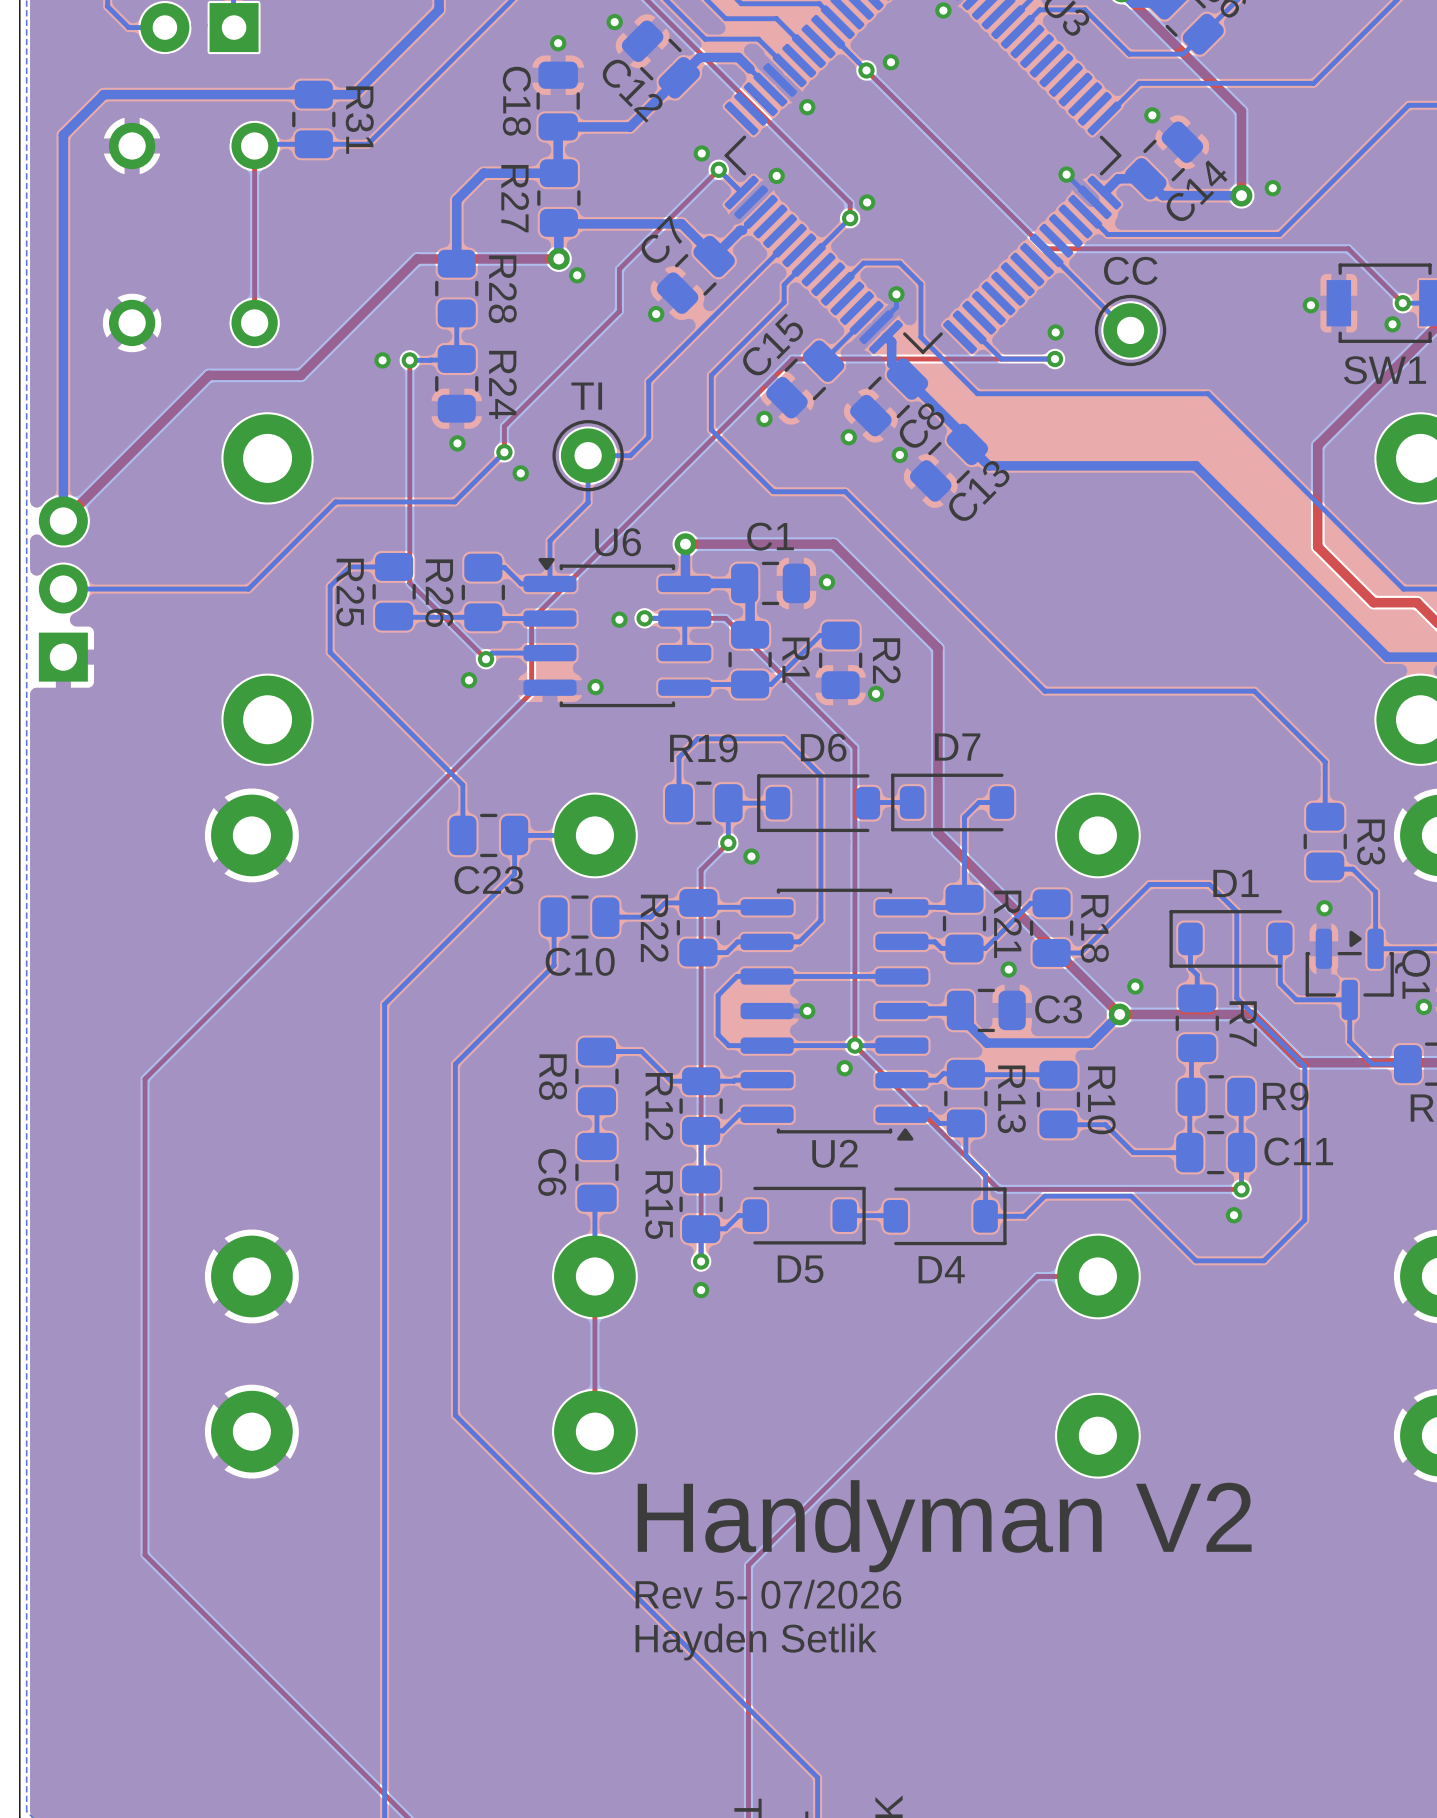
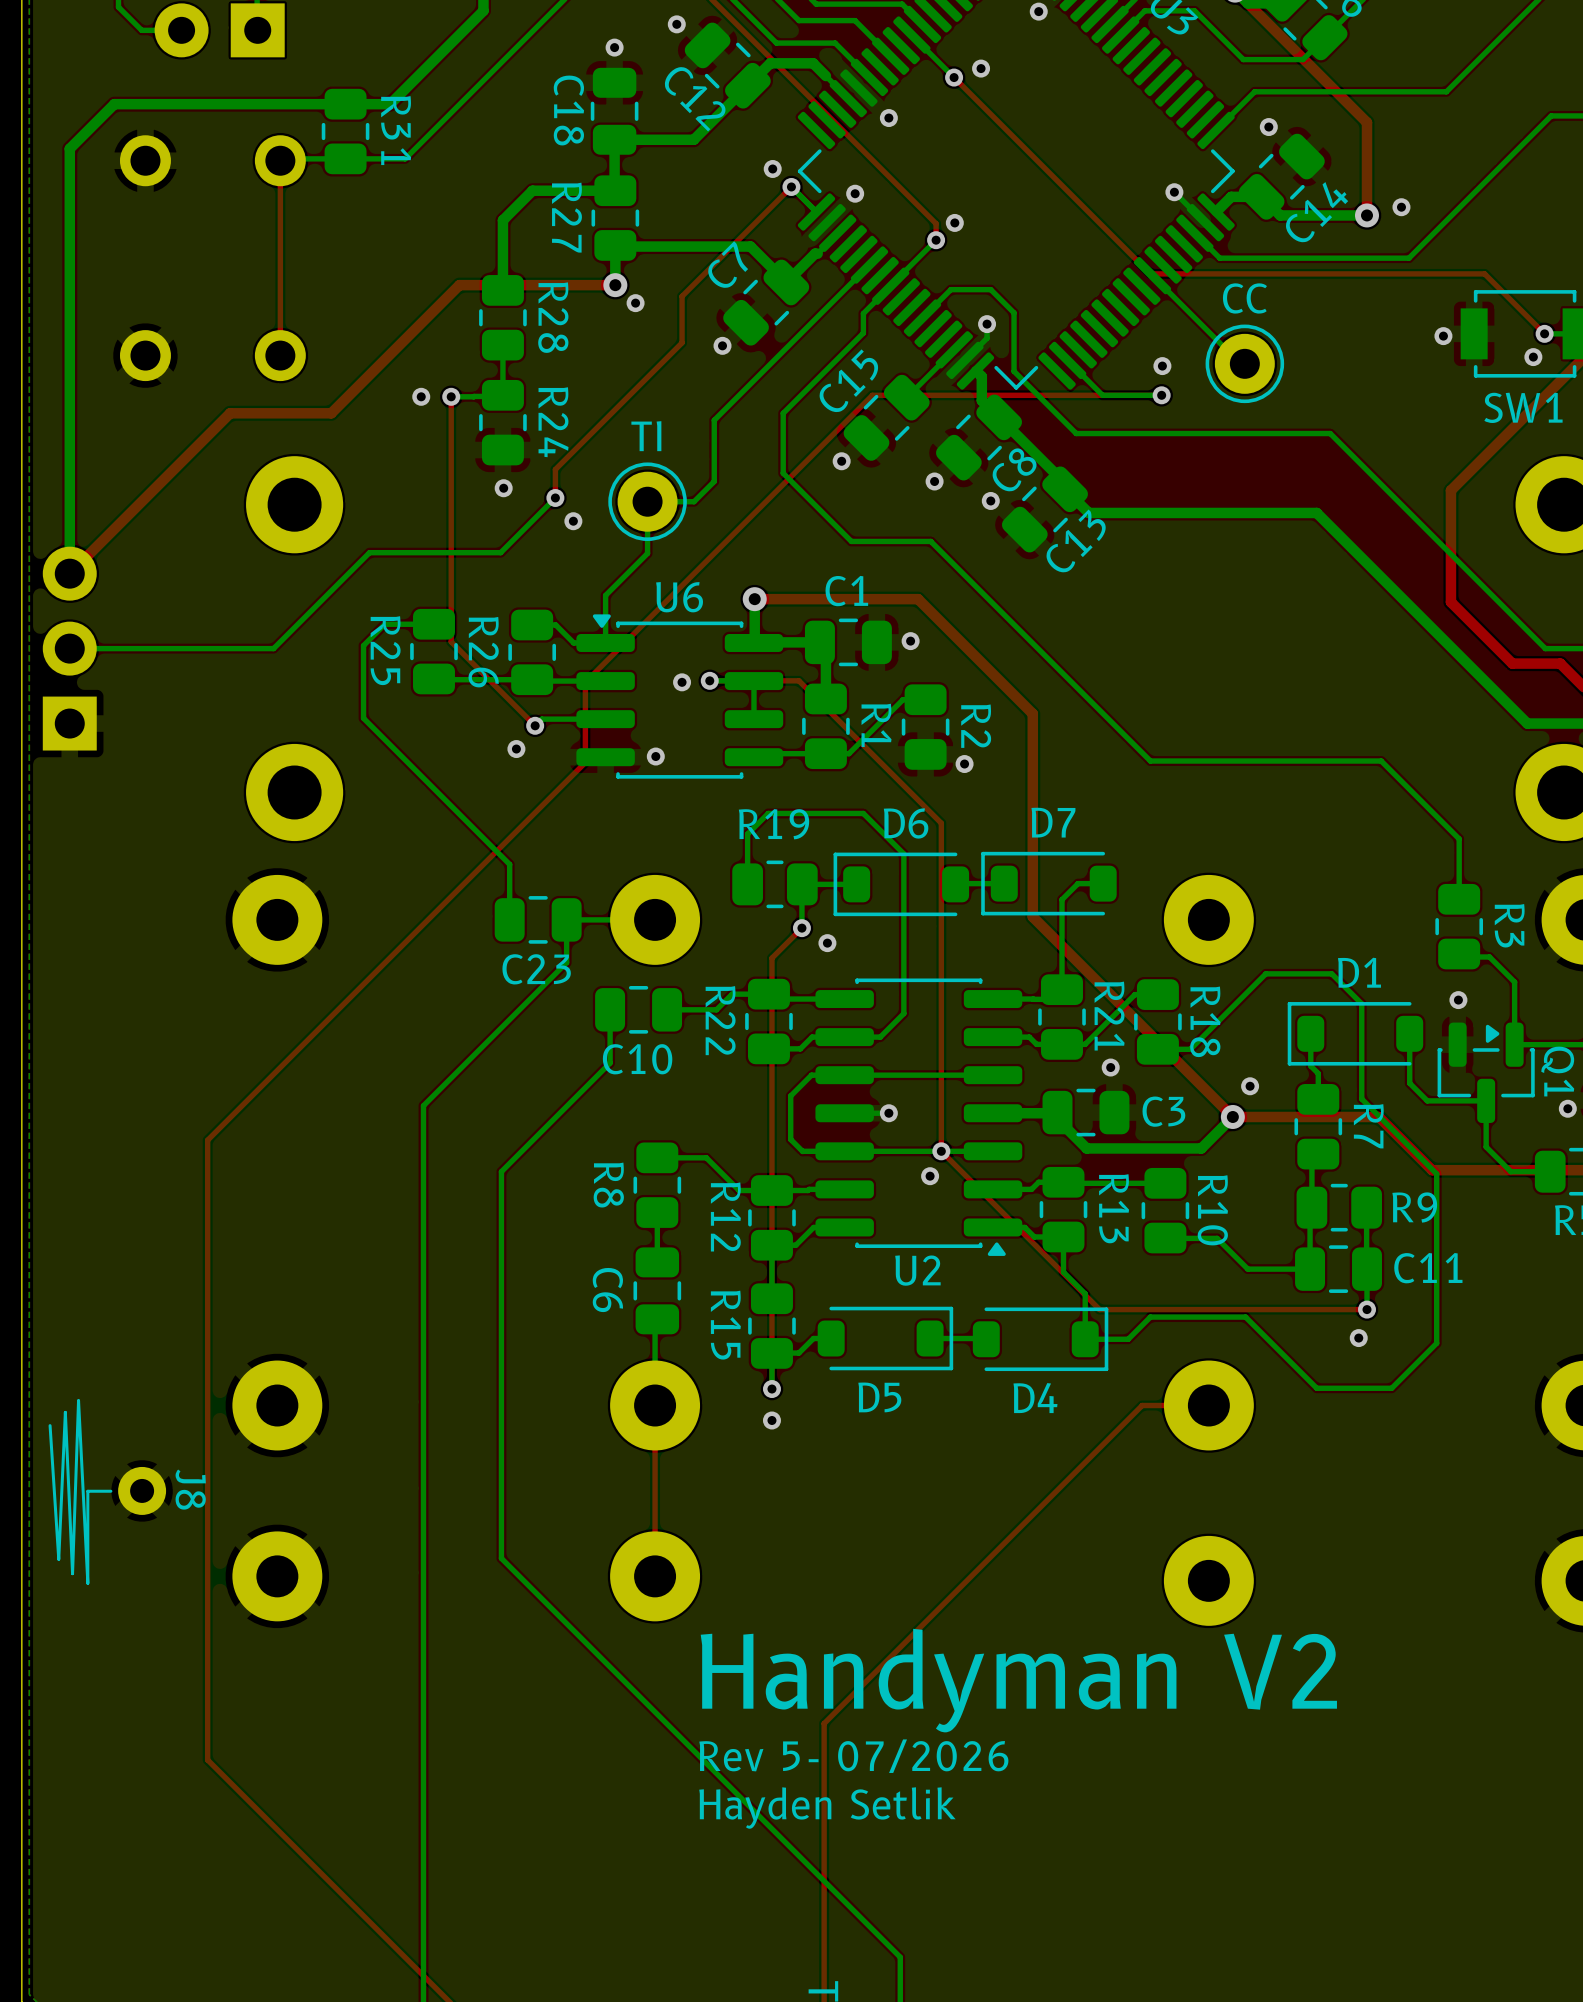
top track: (188, 1035) (145, 1079) (145, 1554) (188, 1598) -> (207, 1140) (207, 1759)
J8: none -> (107, 1491)

